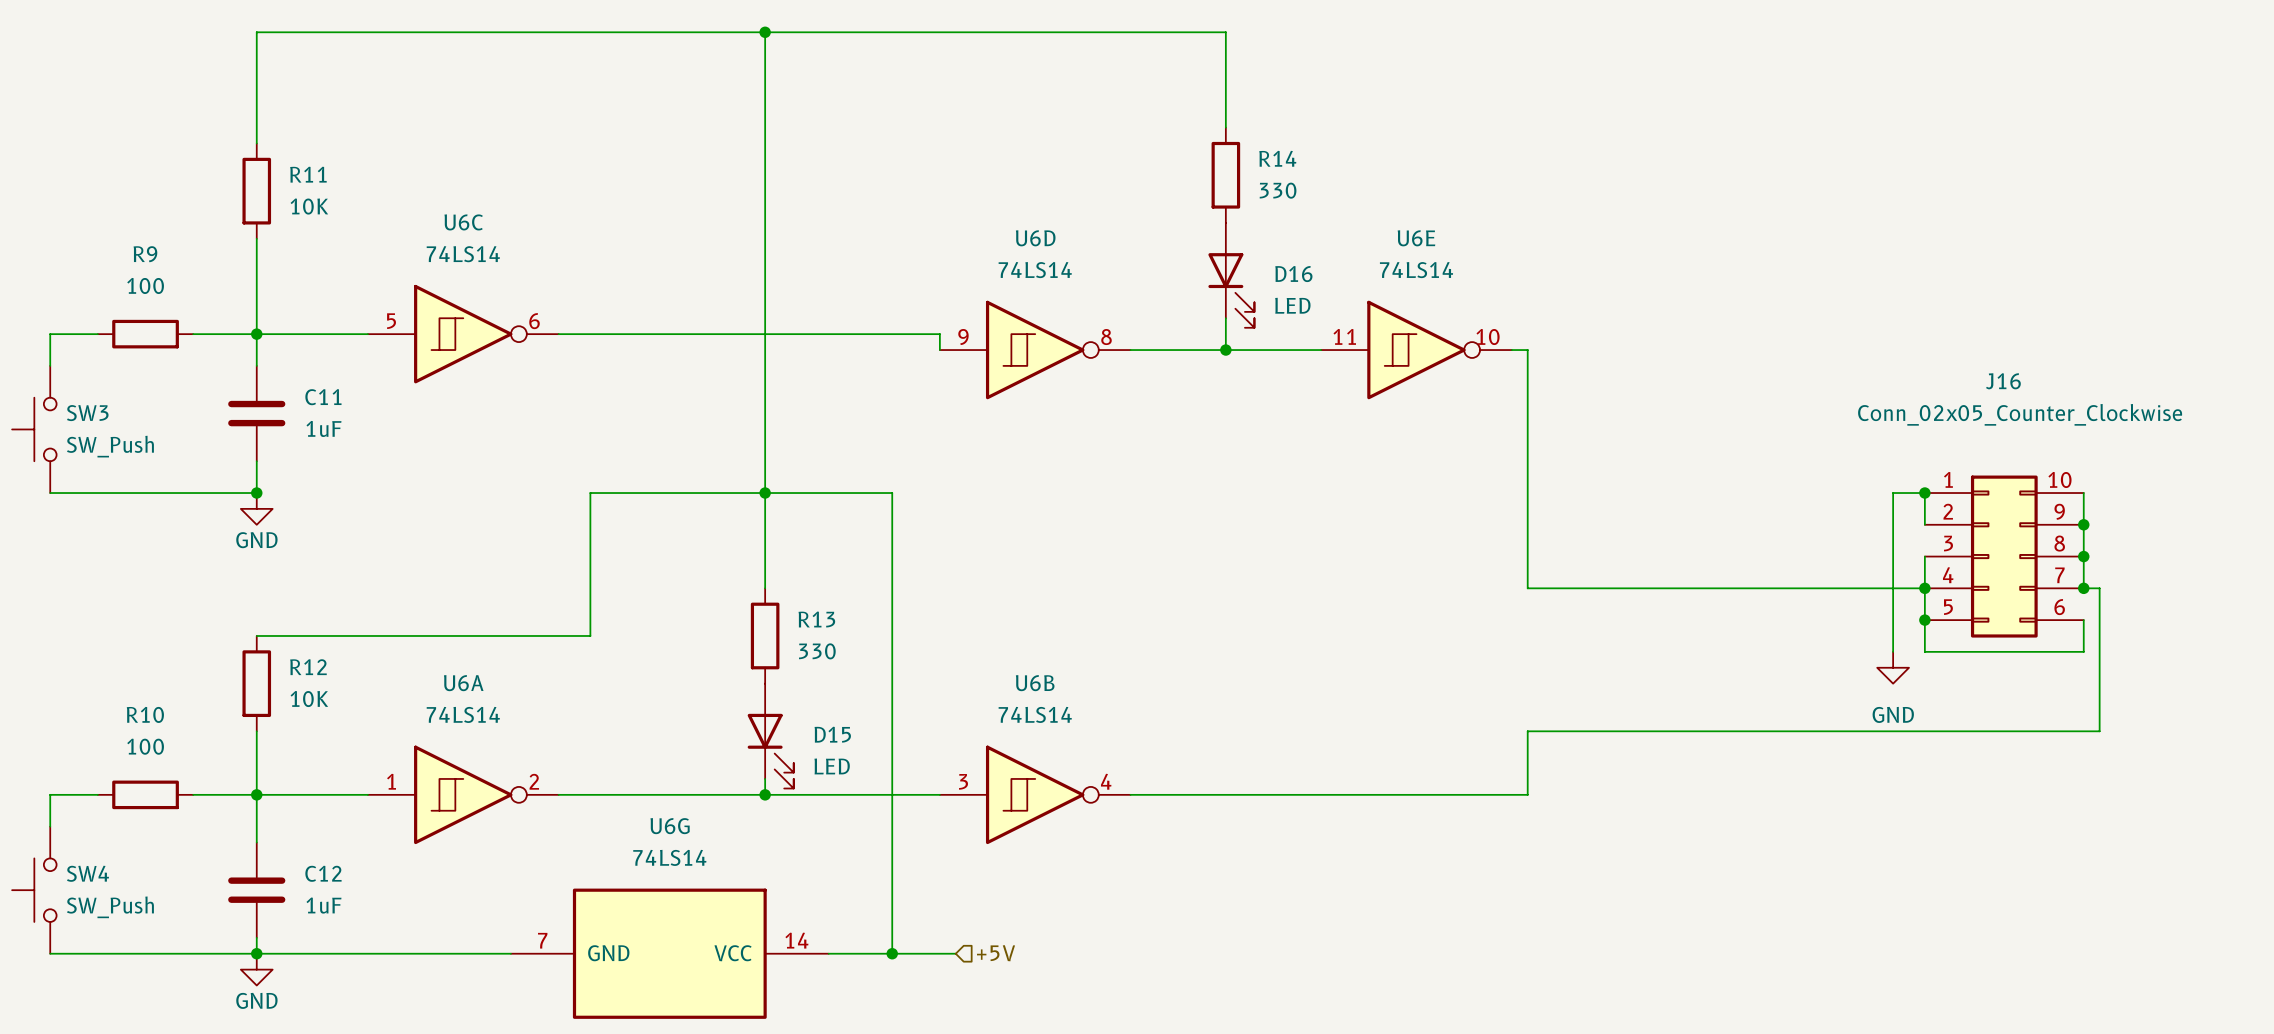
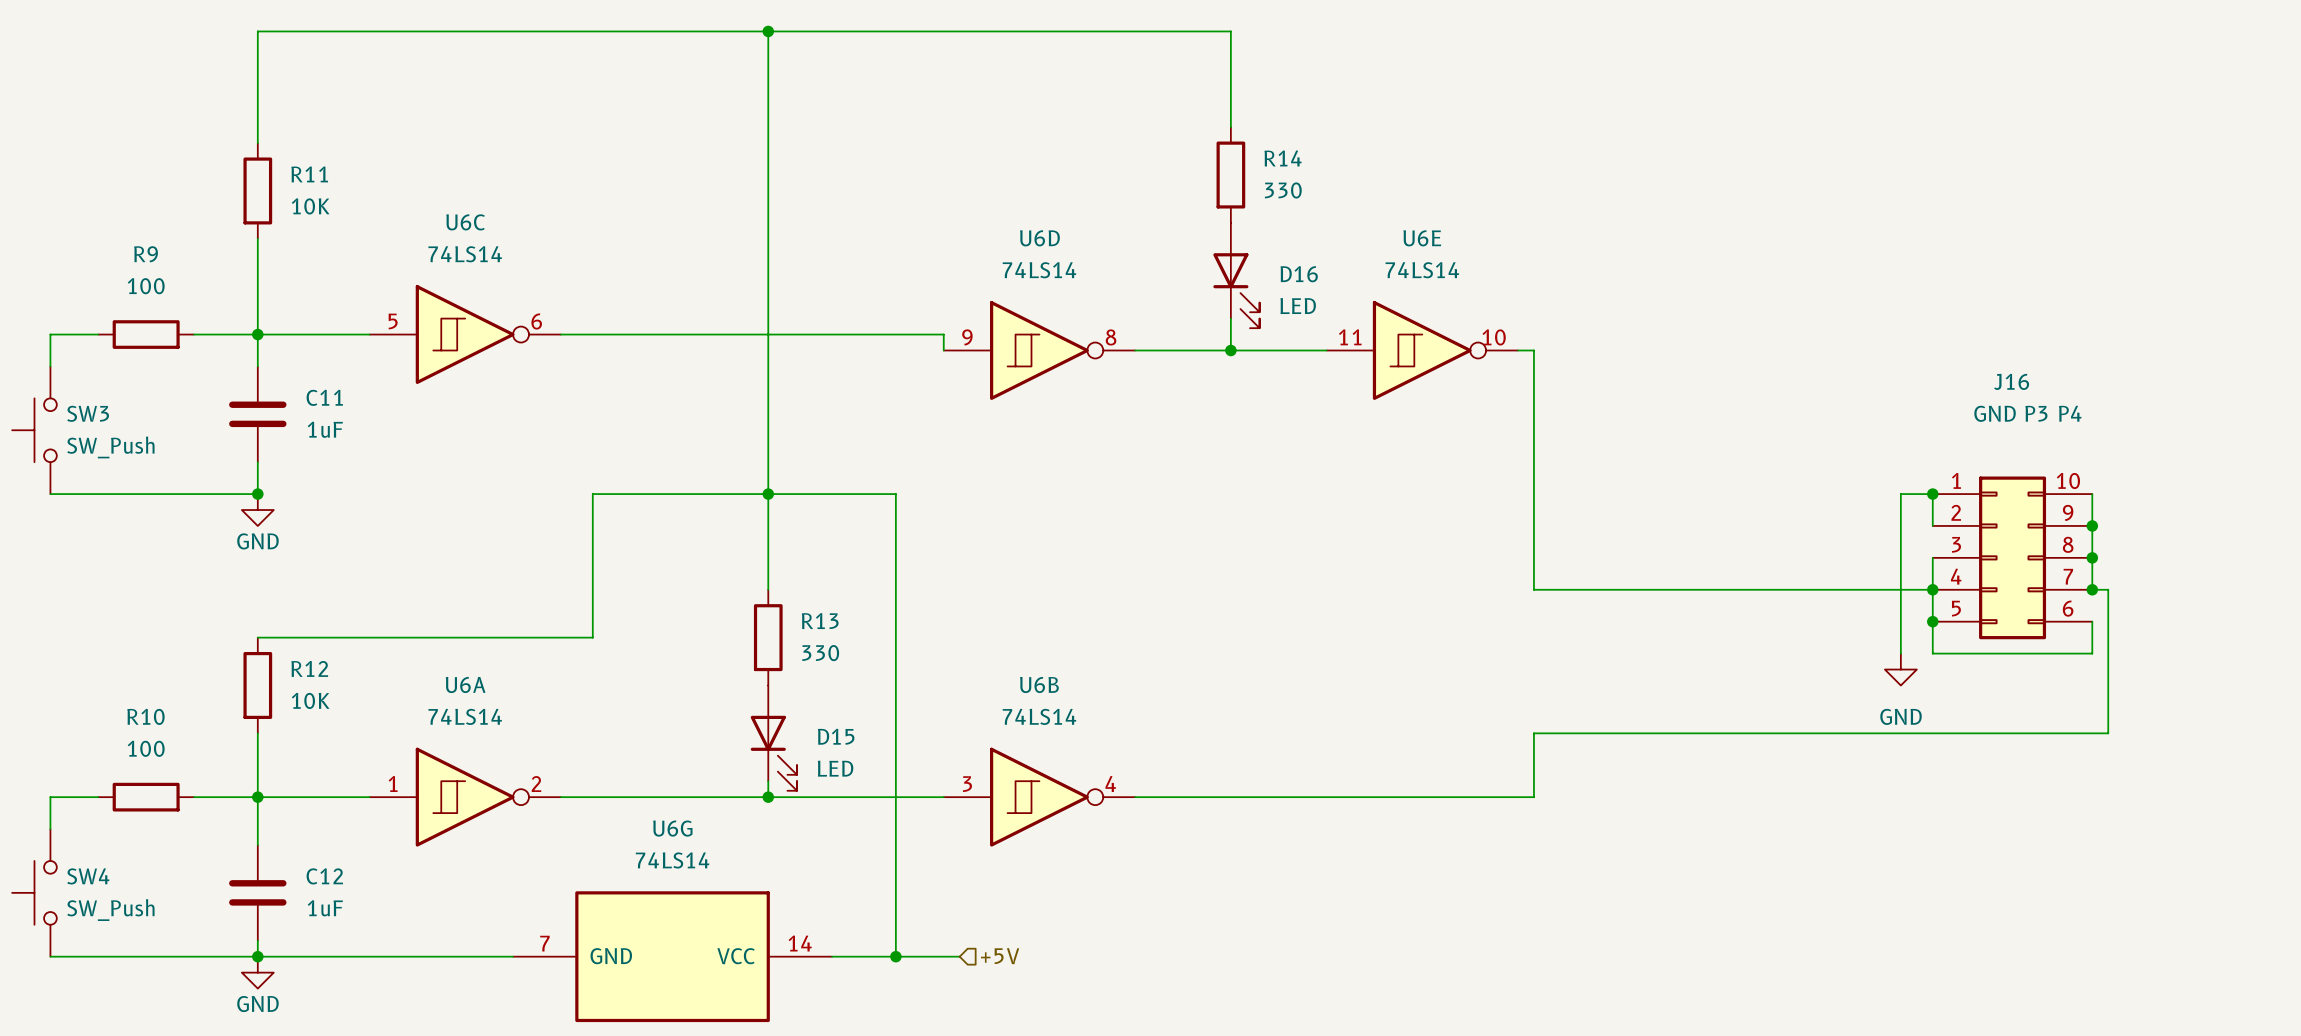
J16 value: Conn_02x05_Counter_Clockwise (2020, 414) -> GND P3 P4 (2027, 413)

